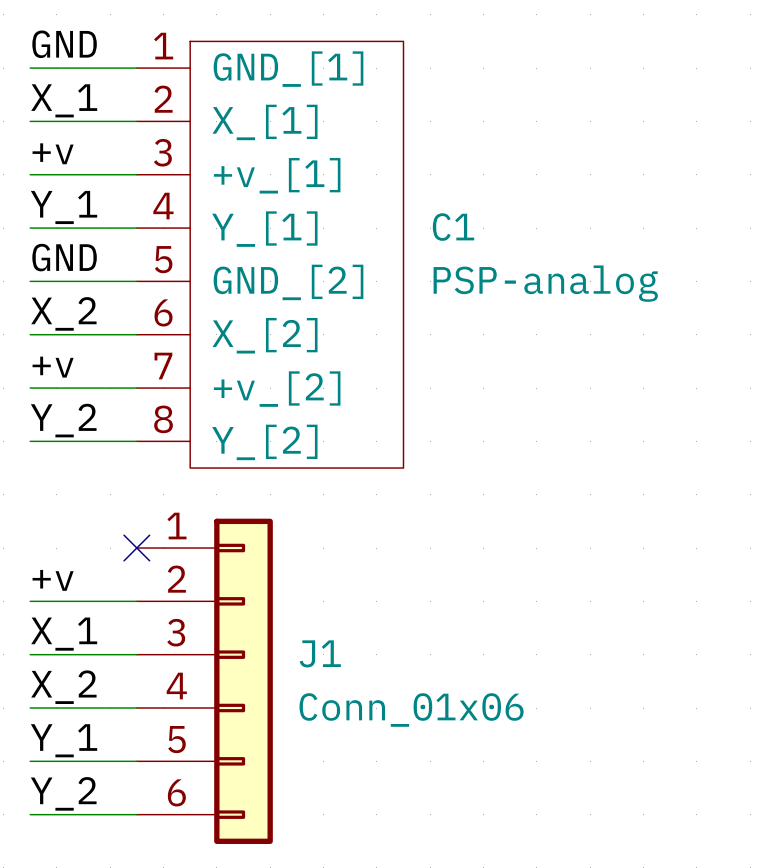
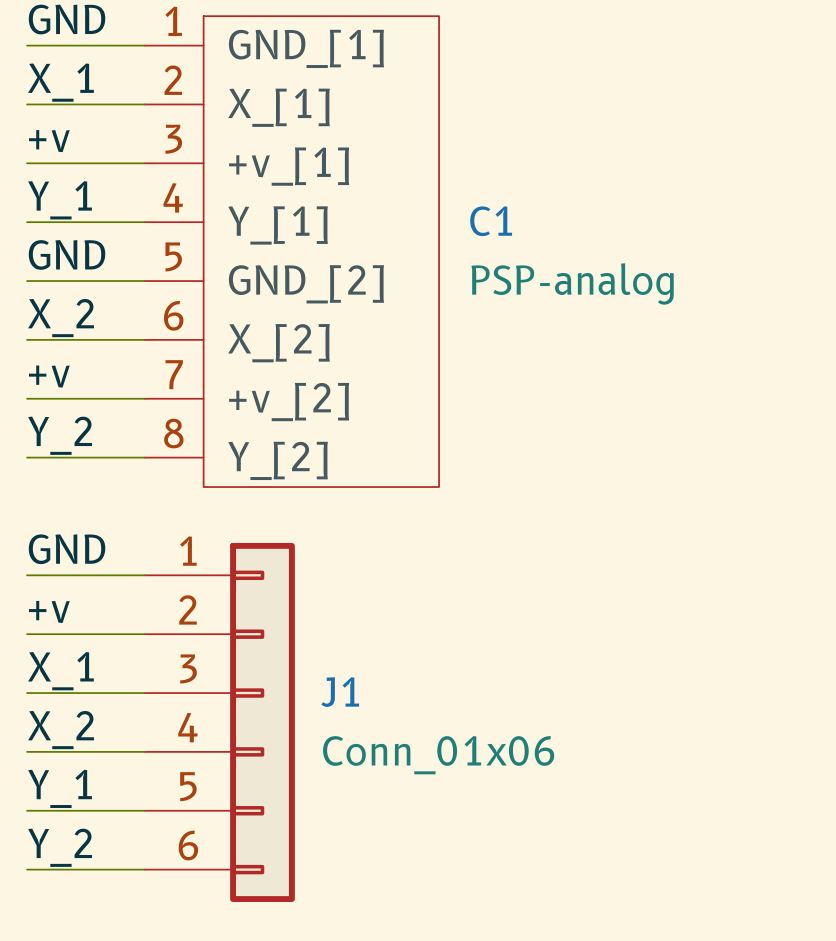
label: none -> GND (67, 549)
wire: none -> (27, 575) (144, 575)
no-connect mark: (136, 548) -> none

